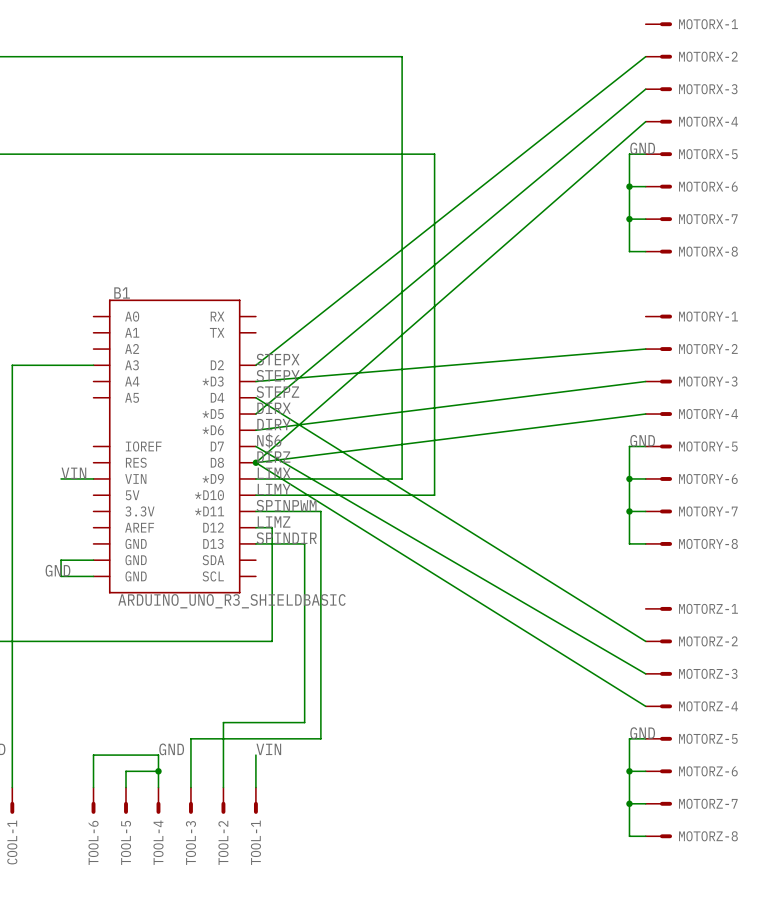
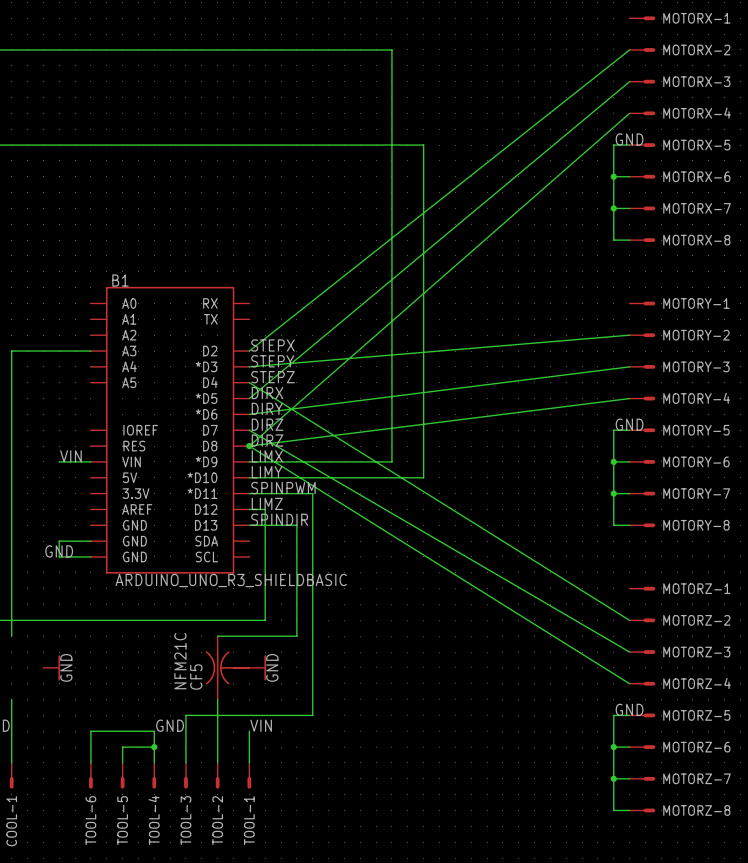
label: N$6 (269, 440) -> DIRZ (267, 424)
wire: (12, 657) (12, 722) -> none
wire: (304, 657) (304, 722) (223, 722) -> (296, 636) (217, 636)
power symbol: none -> GND (51, 667)
CF5: none -> NFM21C (227, 667)
power symbol: none -> GND (257, 667)

